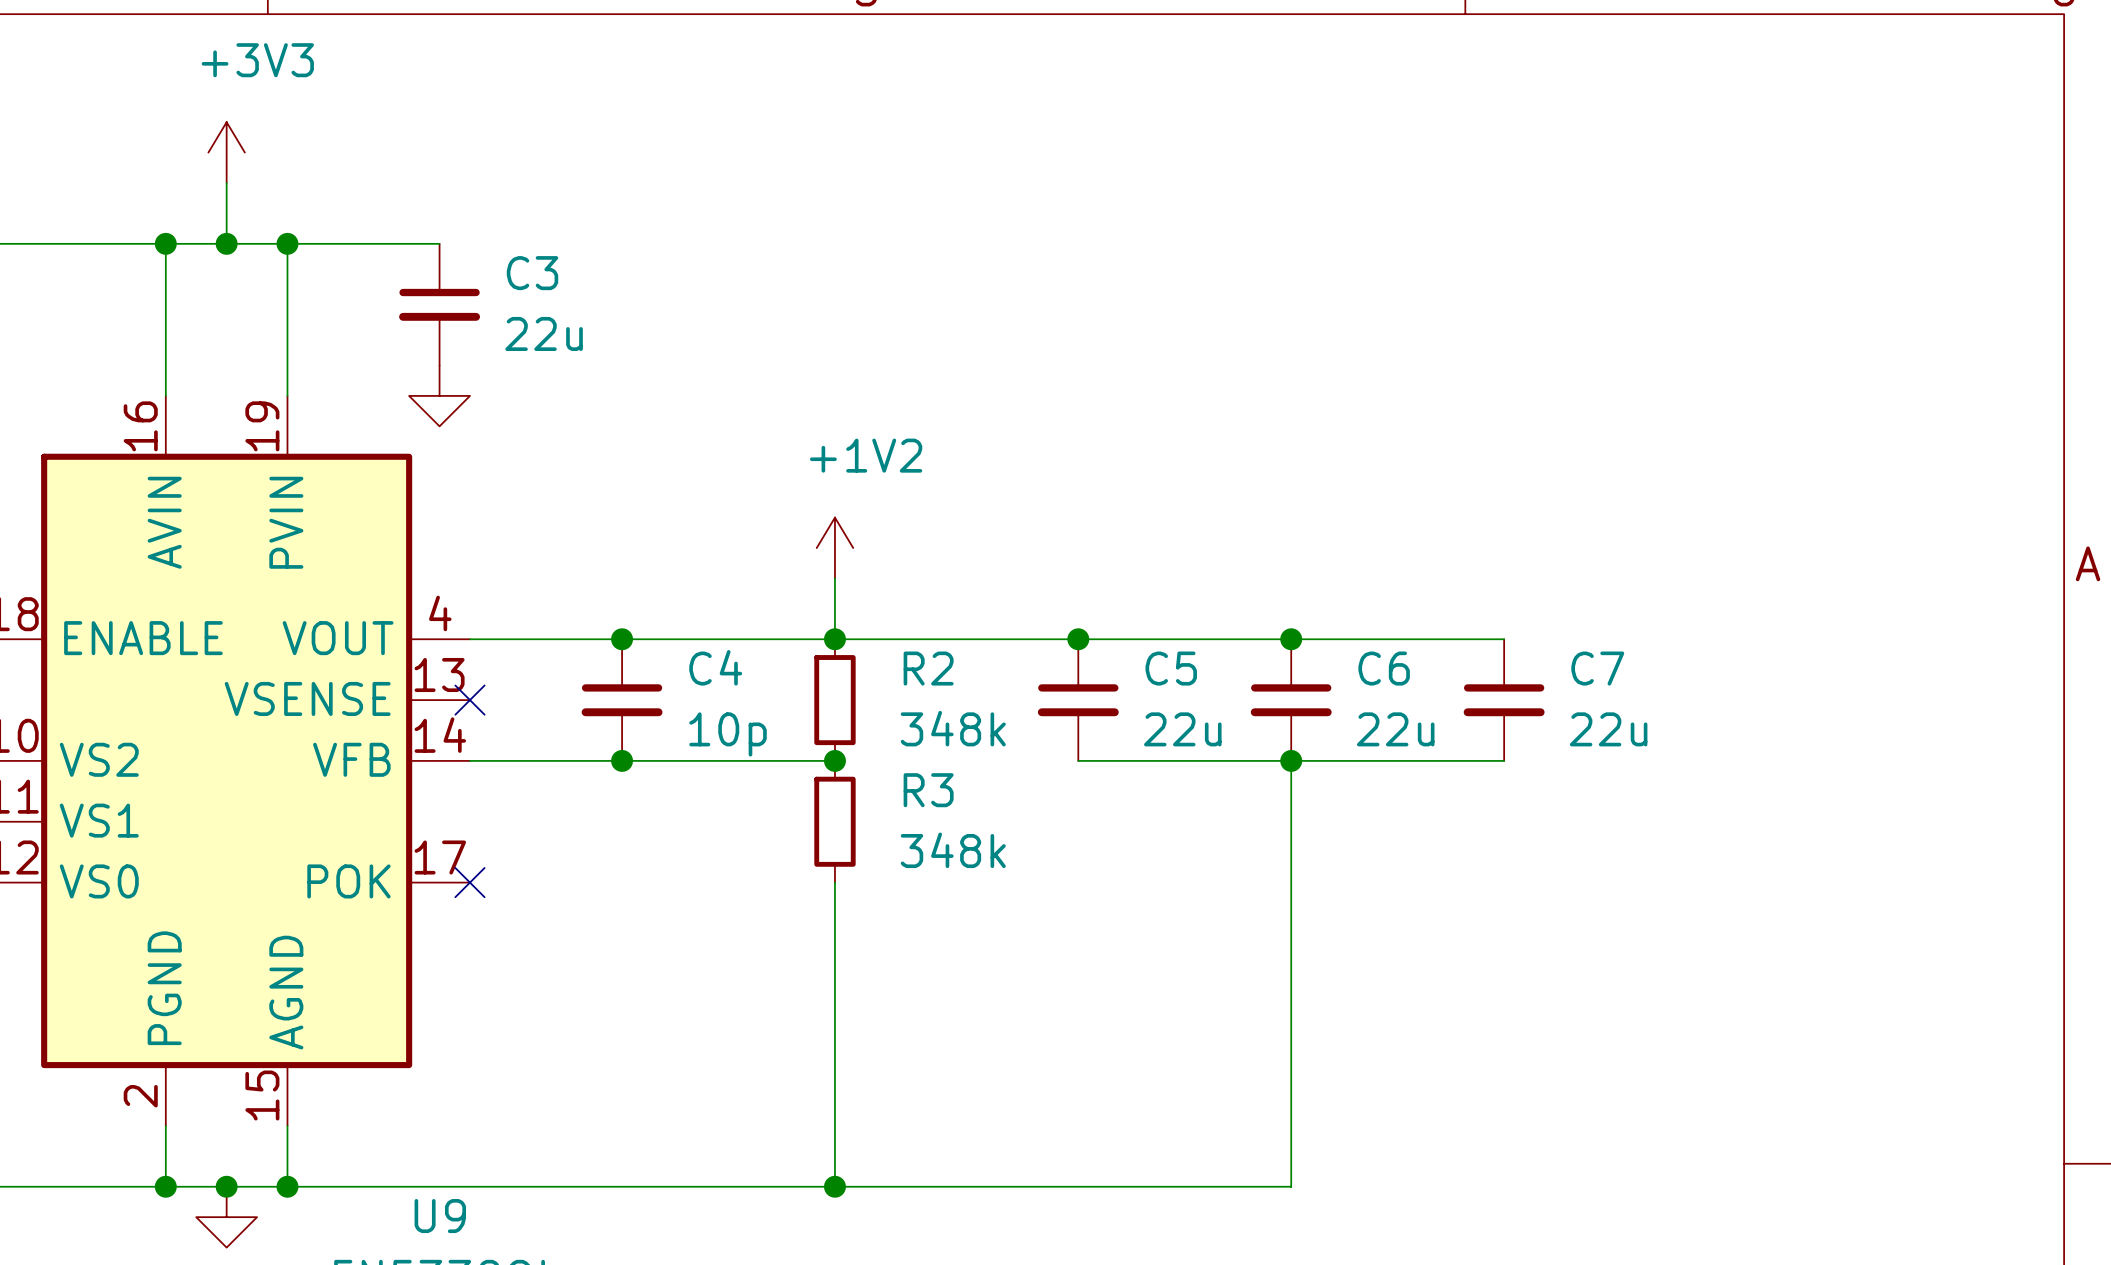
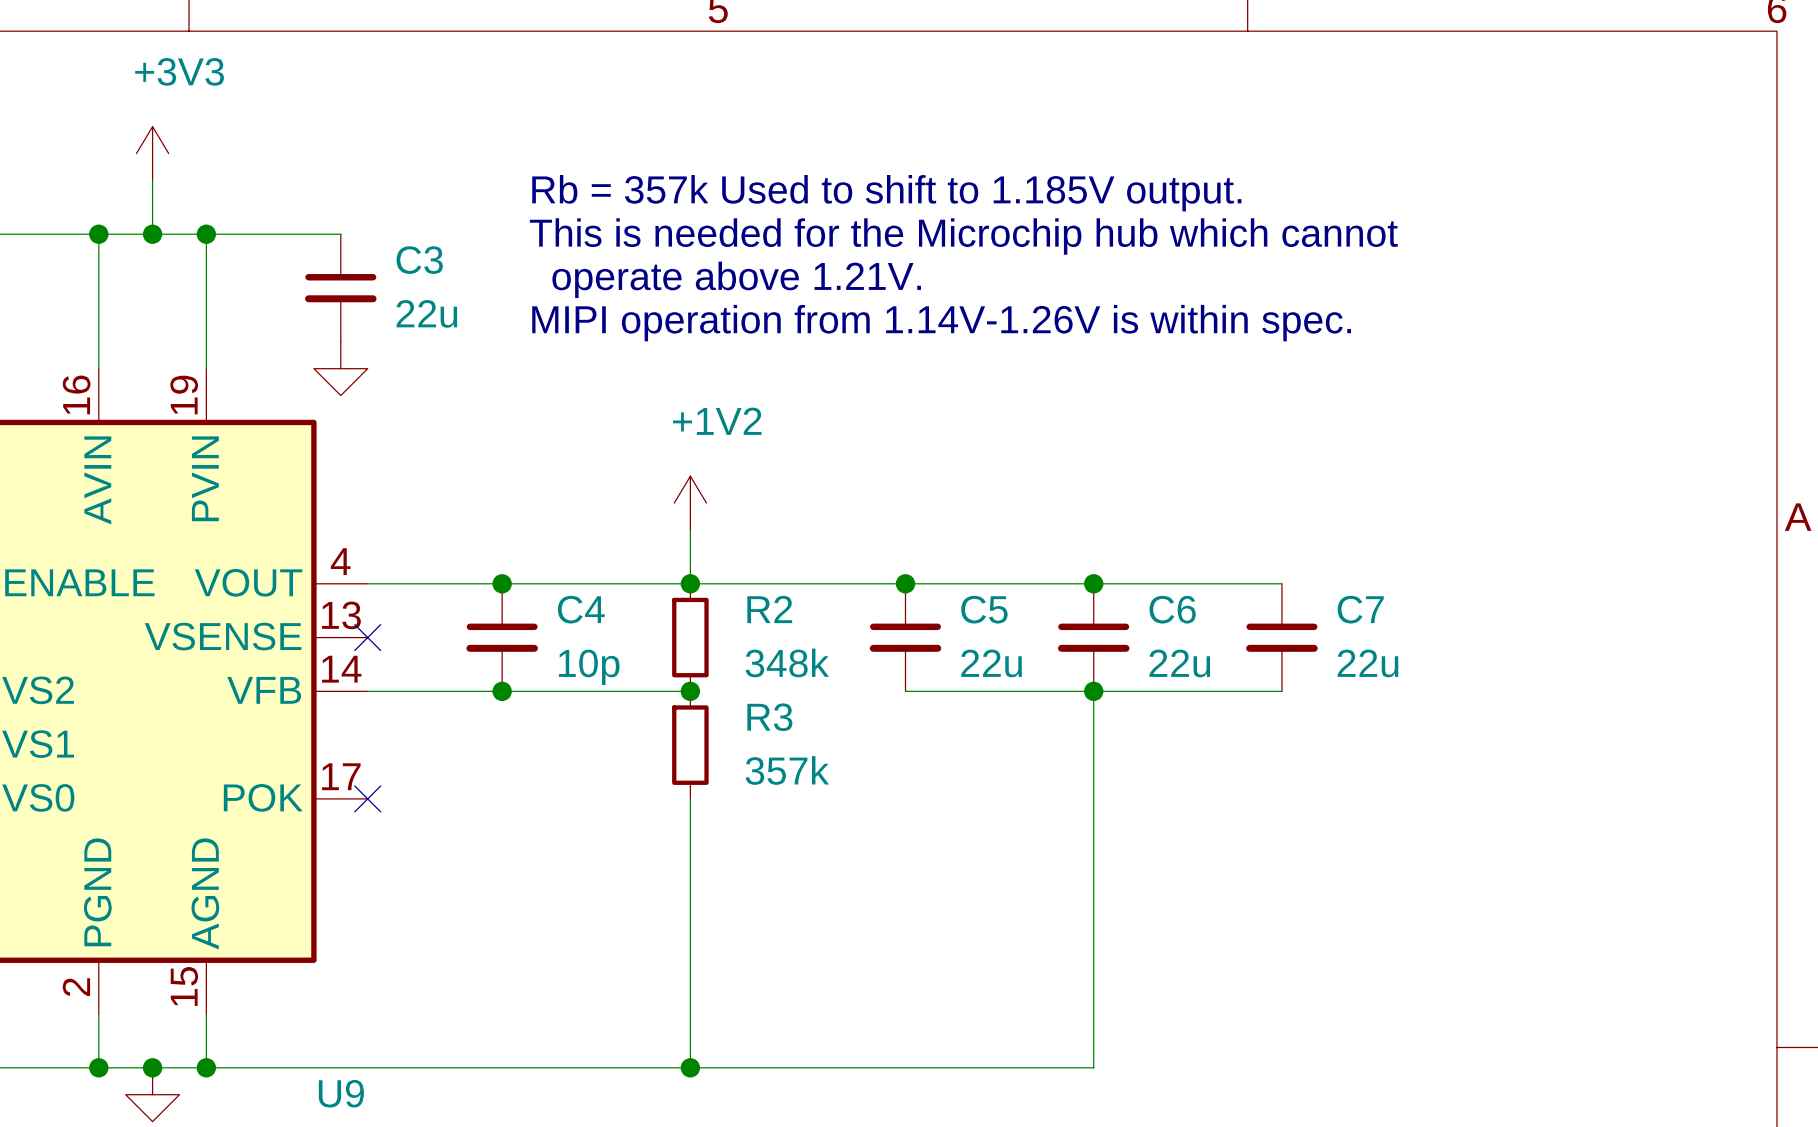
text: none -> Rb = 357k Used to shift to 1.185V output. (886, 193)
text: none -> This is needed for the Microchip hub which cannot (963, 236)
text: none -> operate above 1.21V. (736, 279)
text: none -> MIPI operation from 1.14V-1.26V is within spec. (941, 323)
R3 value: 348k (953, 850) -> 357k (787, 770)

